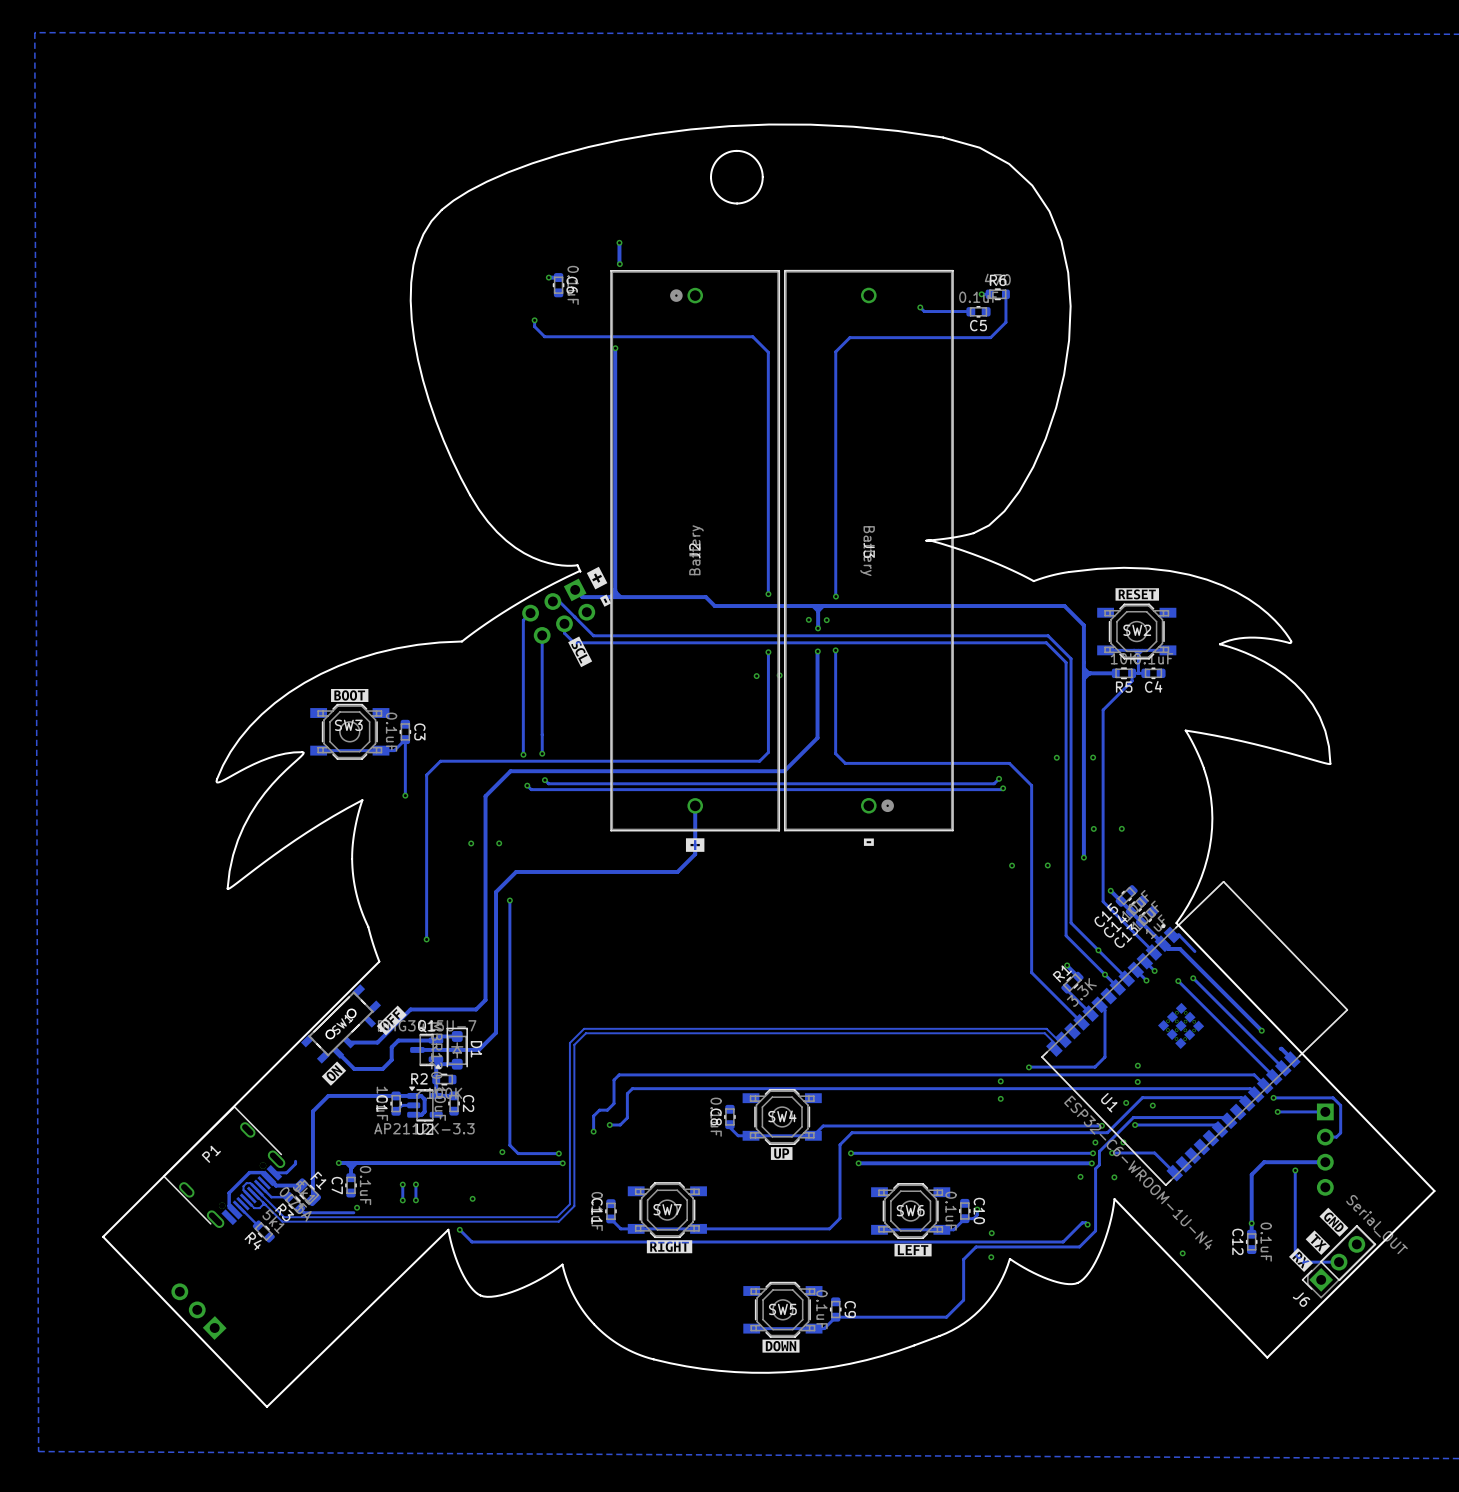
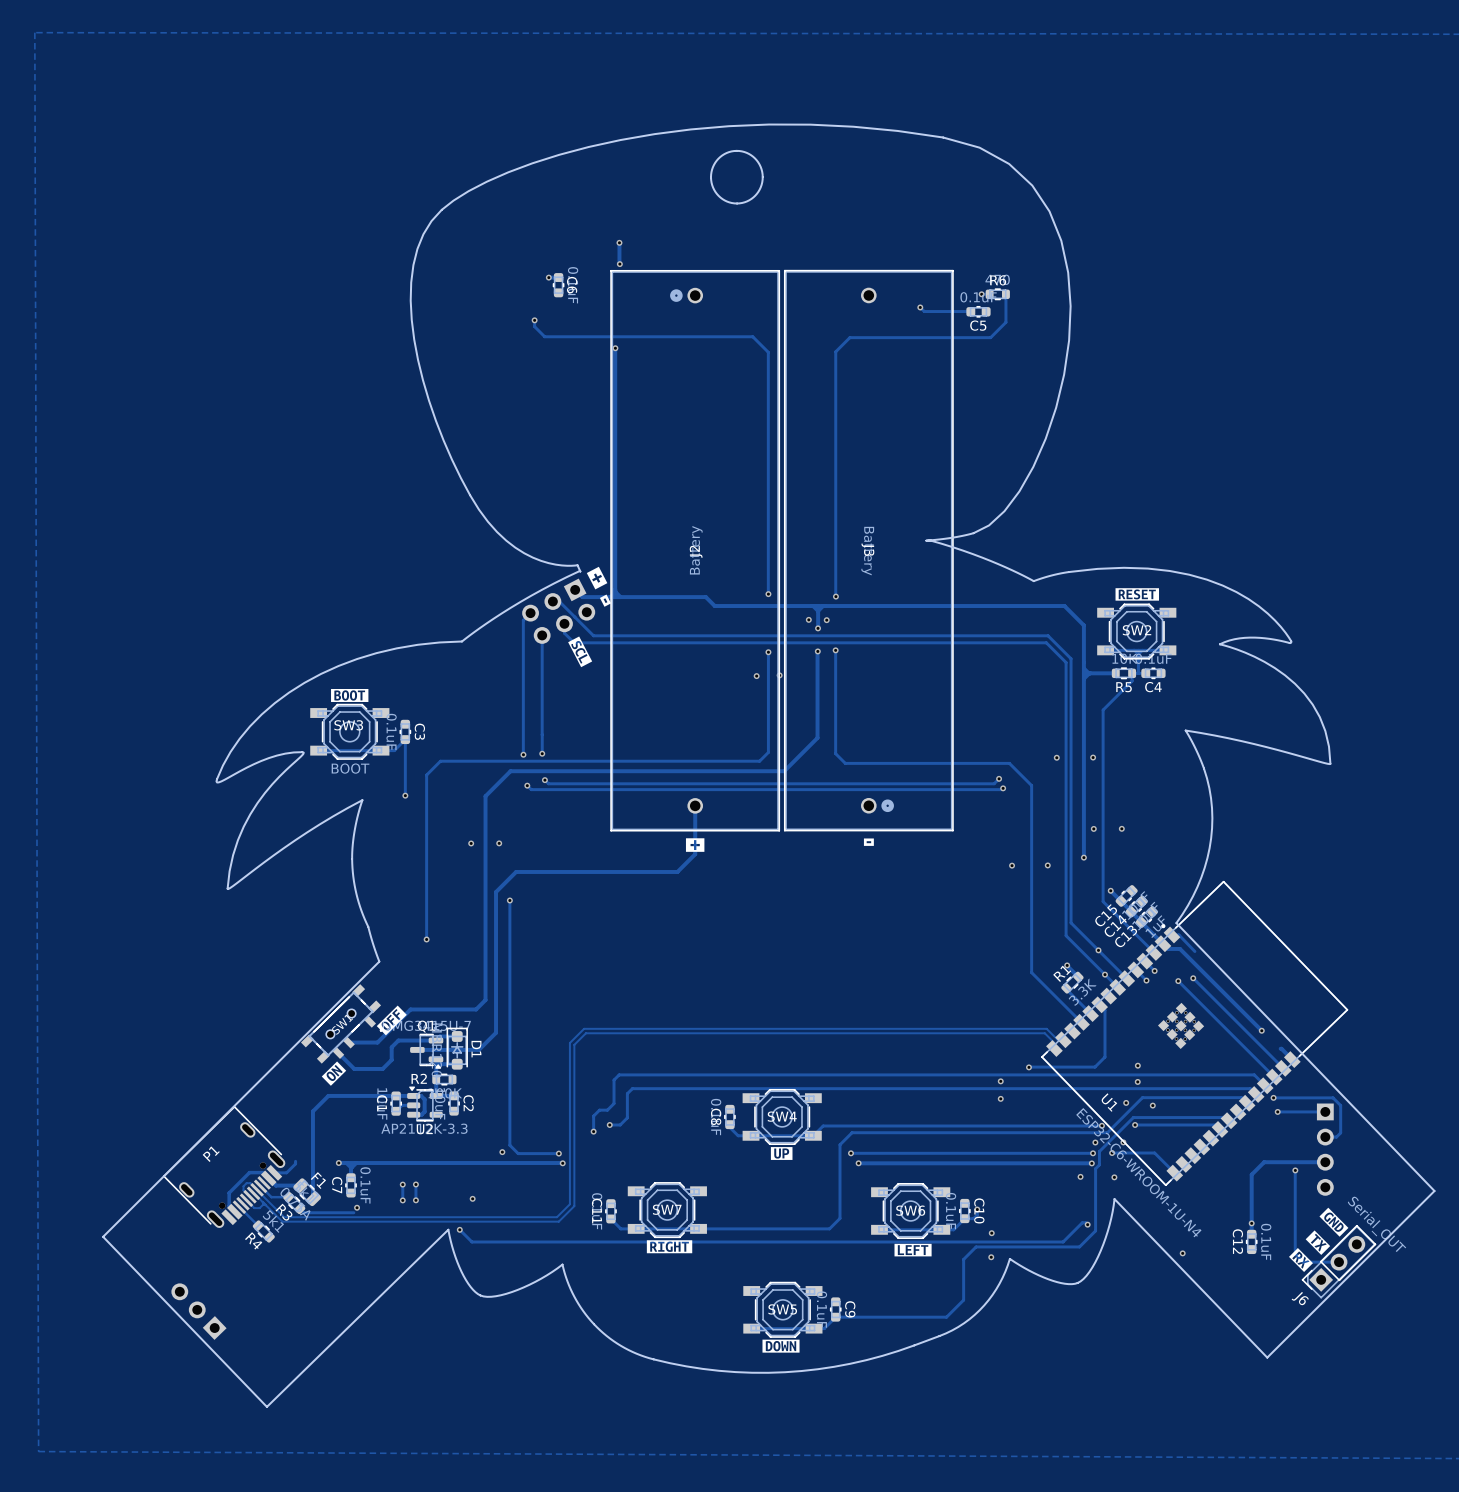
SW3 value: none -> BOOT (350, 768)

